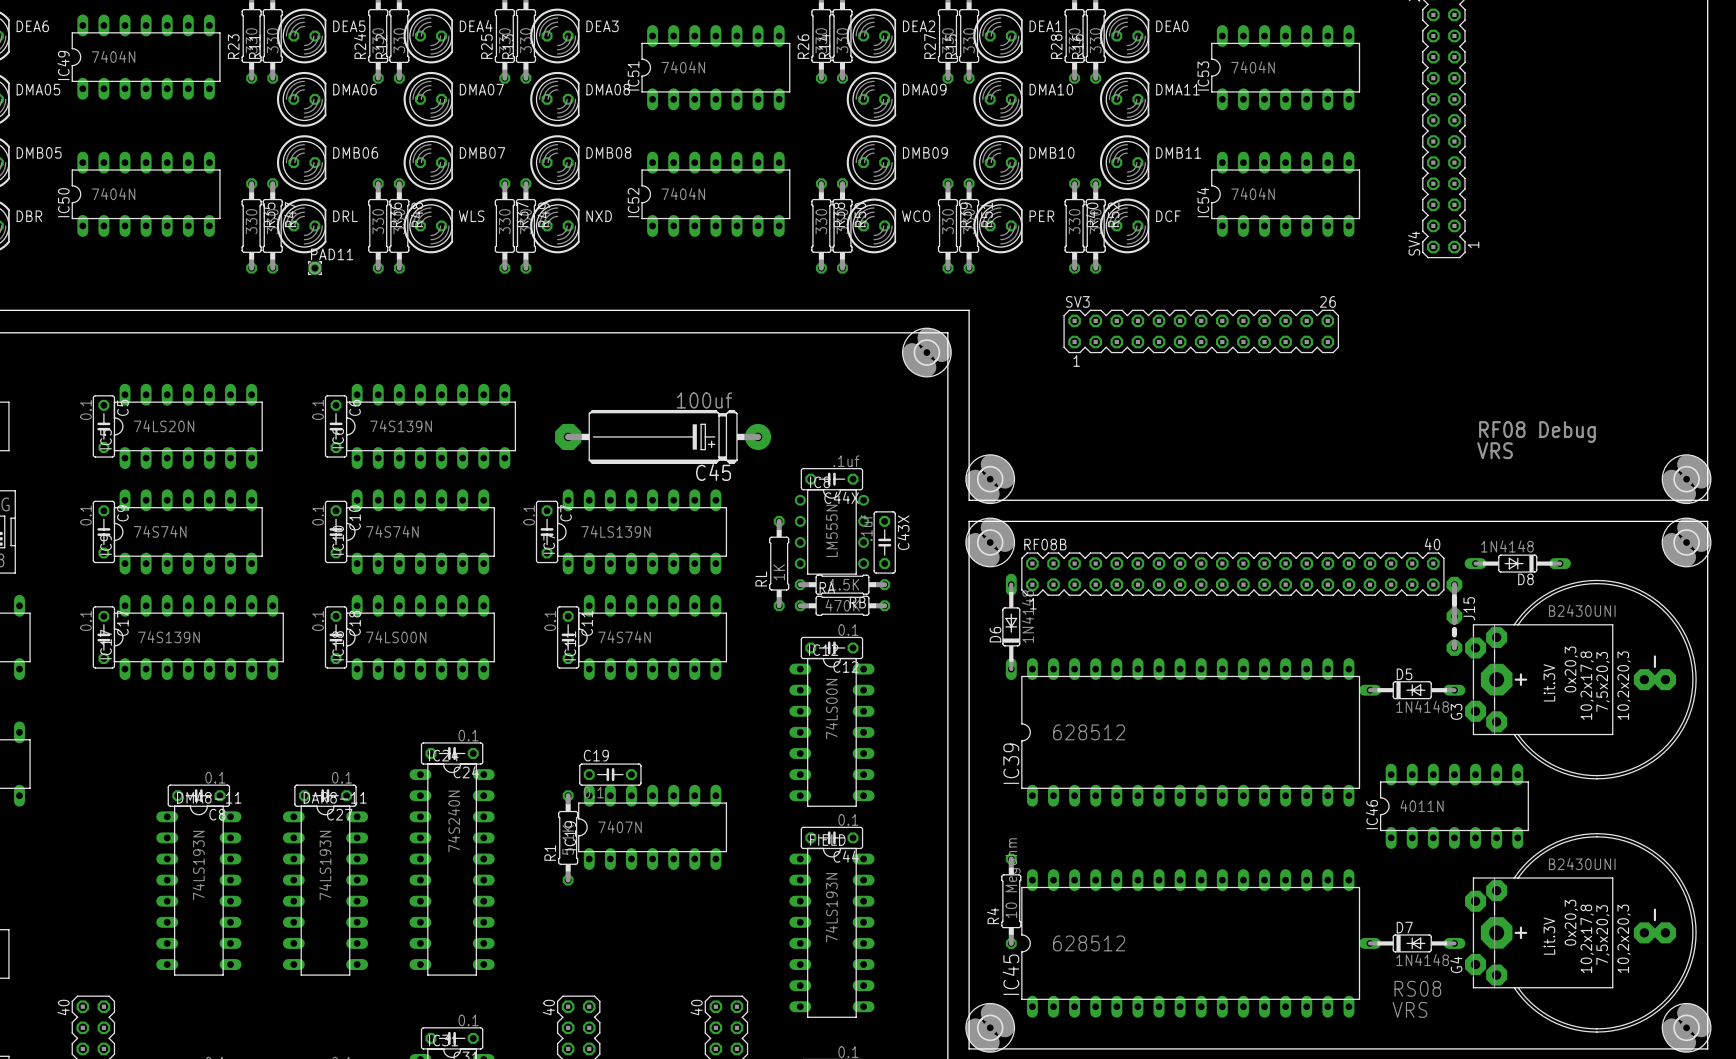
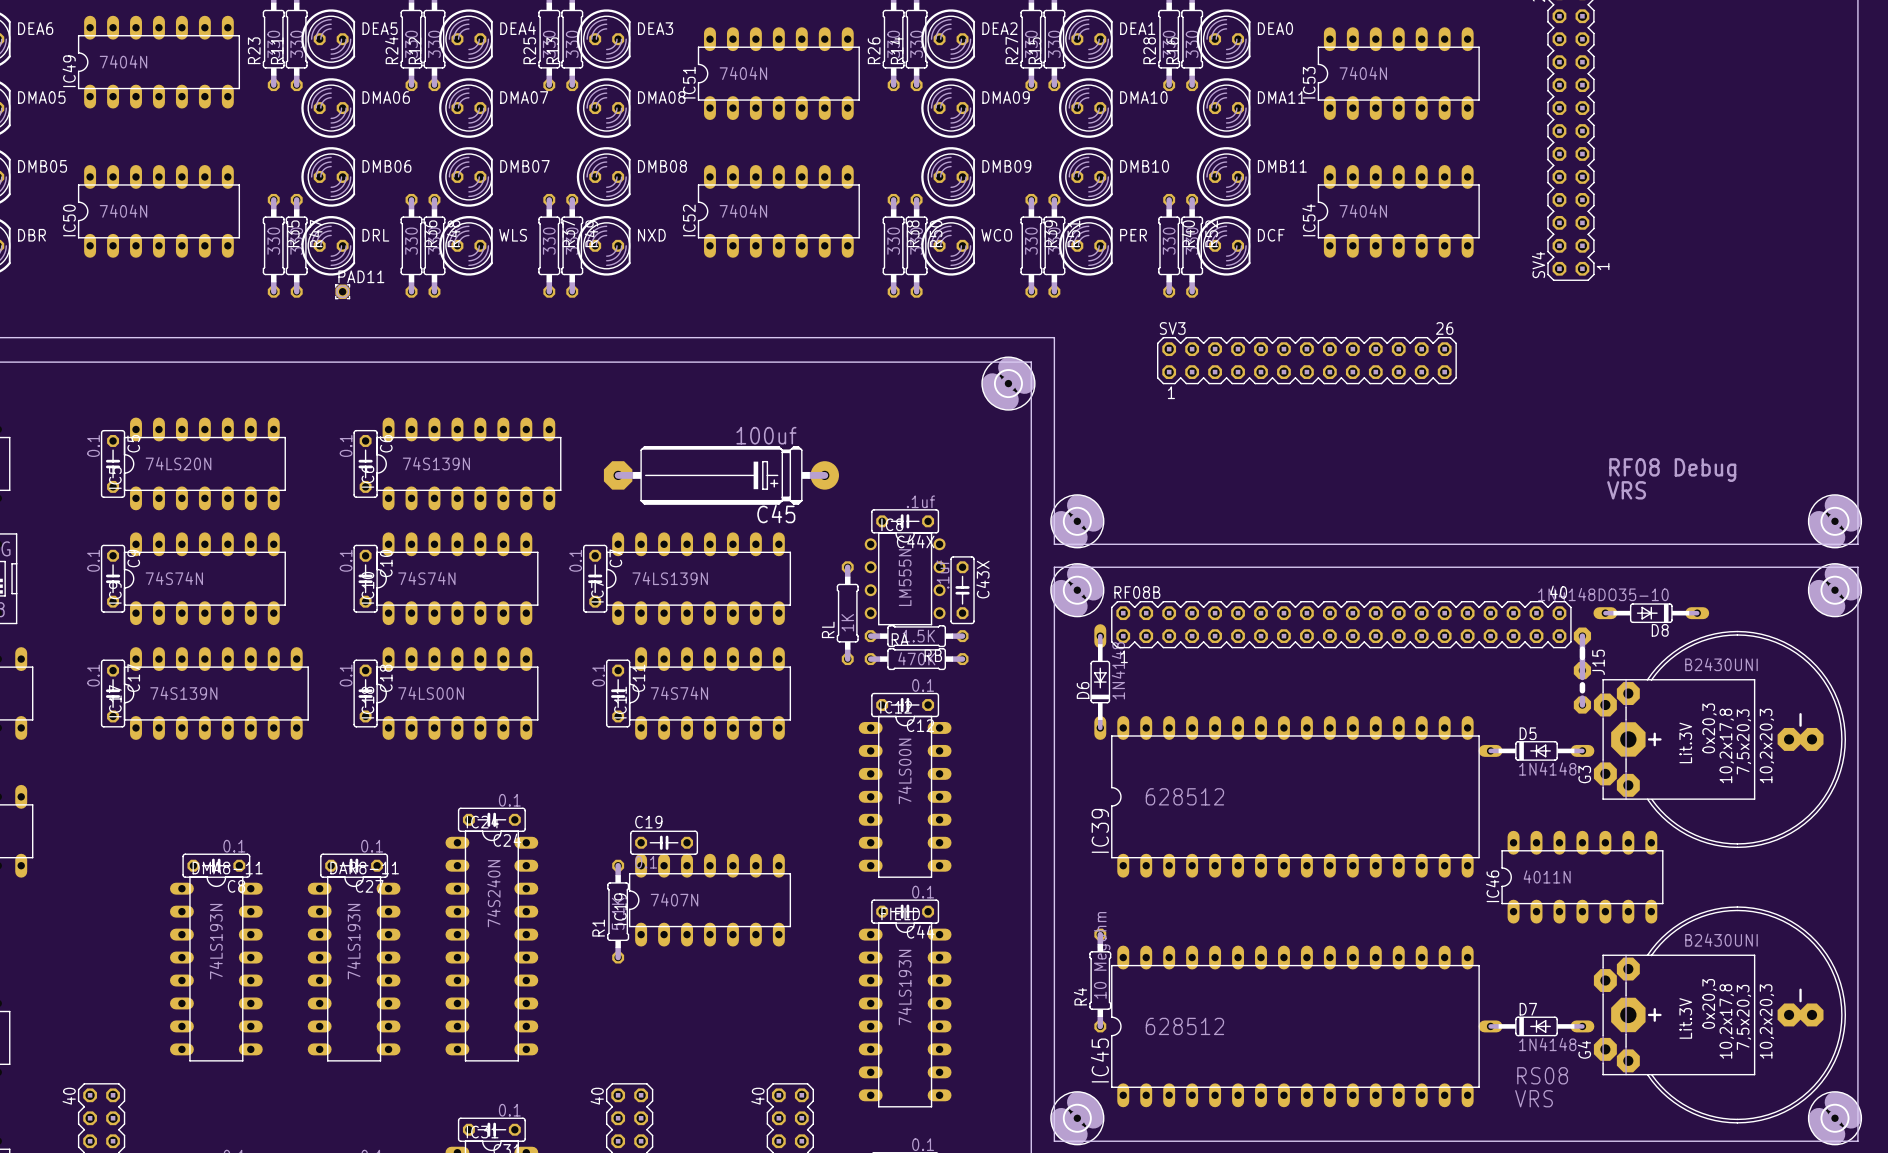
D8 value: 1N4148 (1507, 546) -> 1N4148DO35-10 (1603, 594)

